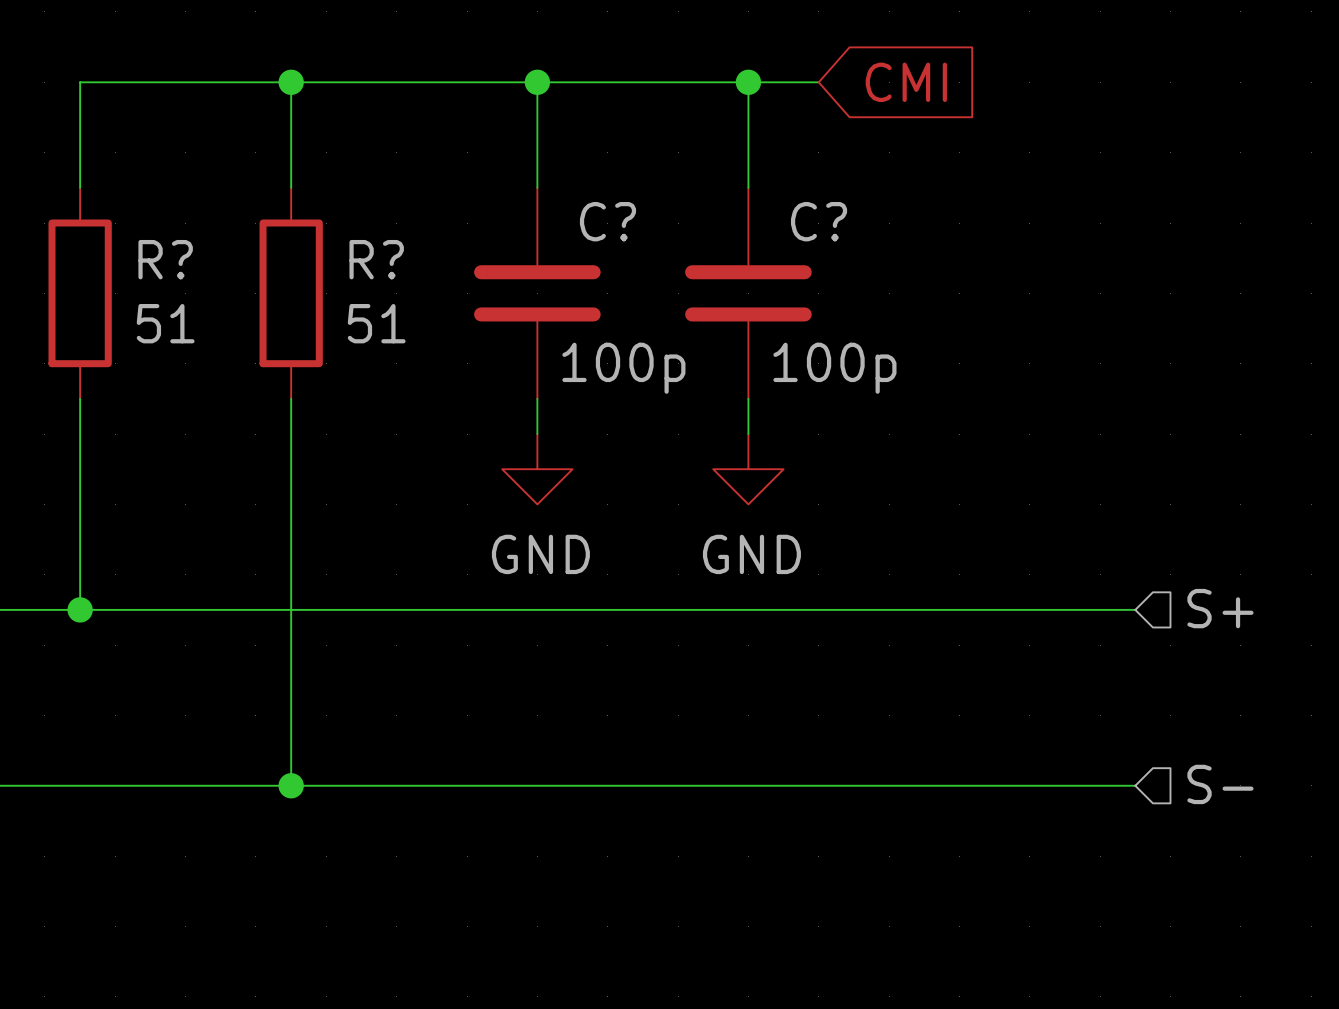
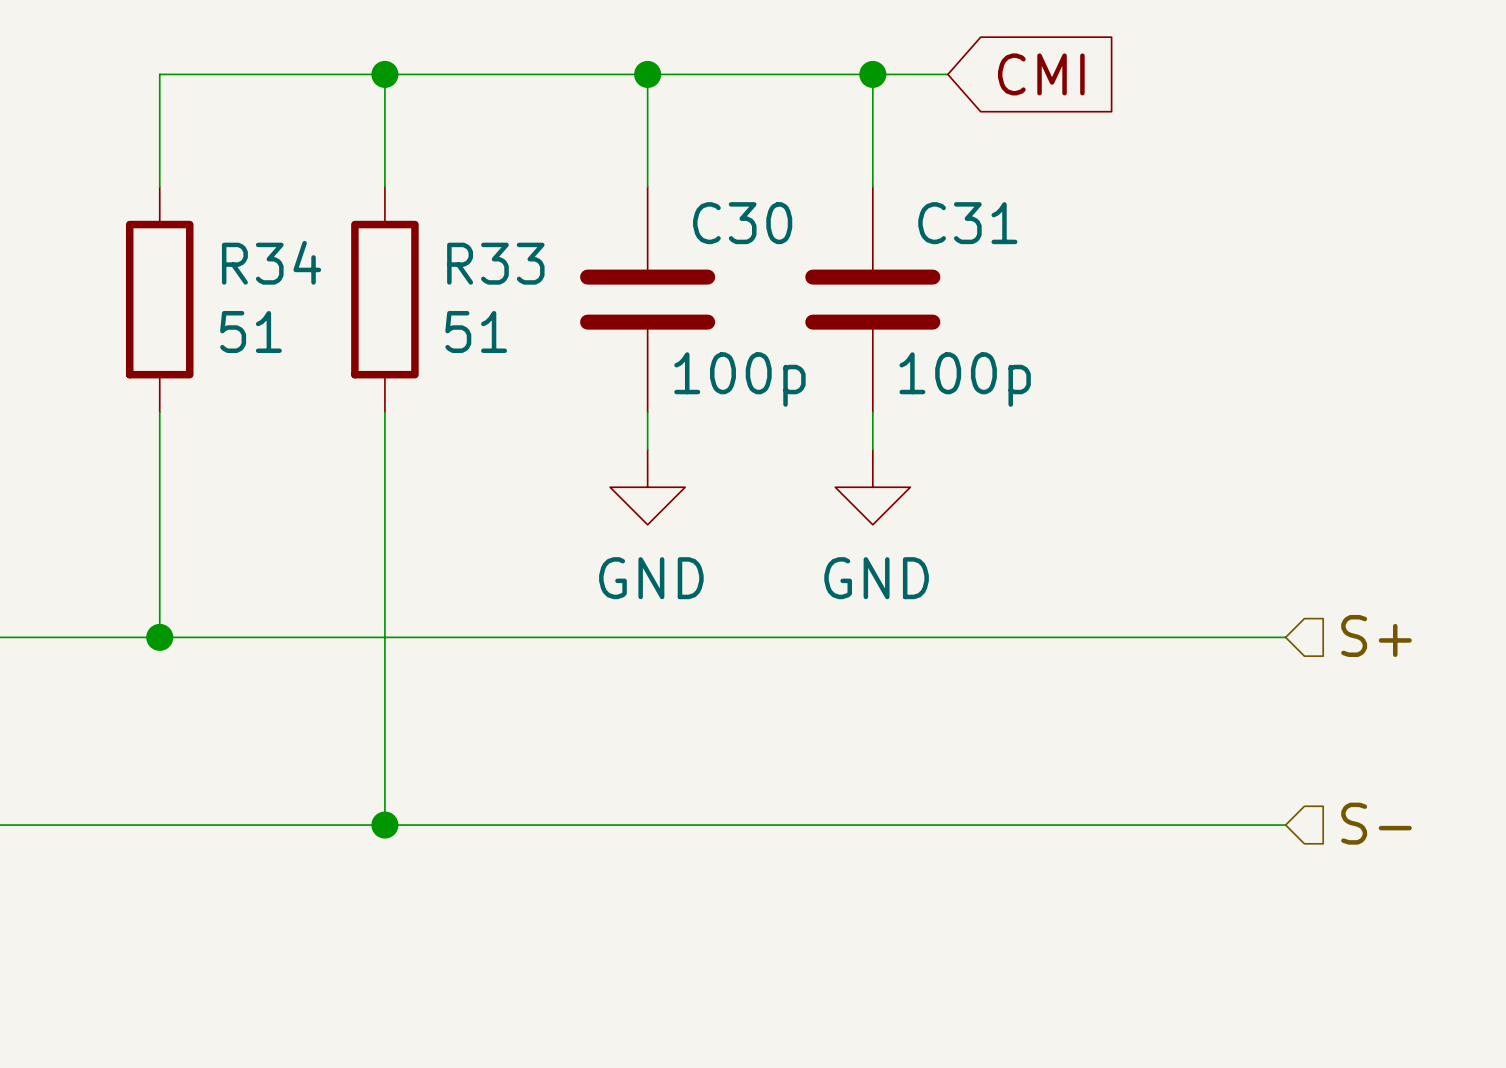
C? name: C? (607, 221) -> C30 (742, 223)
C? name: C? (819, 221) -> C31 (967, 223)
R? name: R? (165, 259) -> R34 (271, 262)
R? name: R? (376, 259) -> R33 (495, 263)

